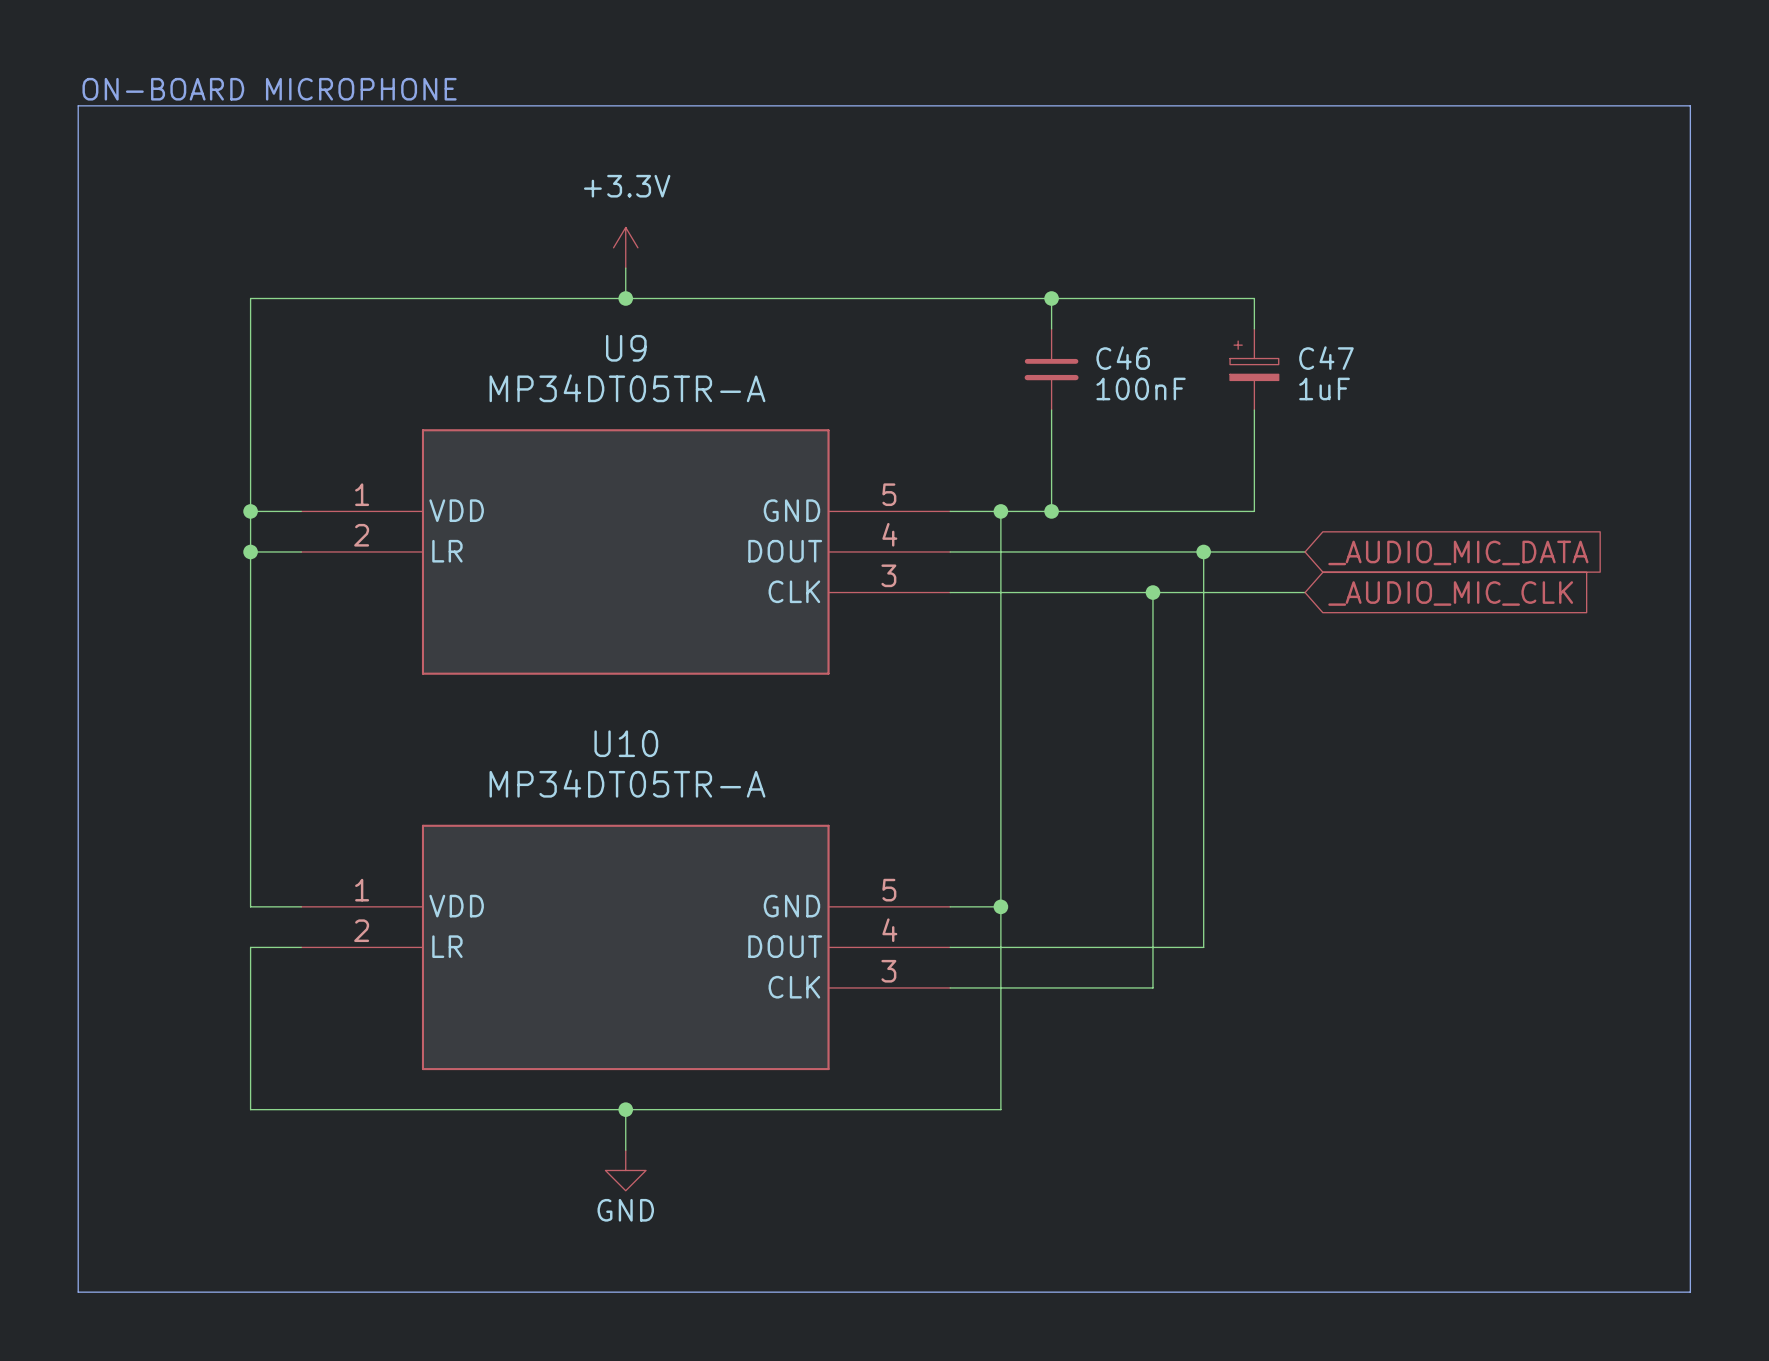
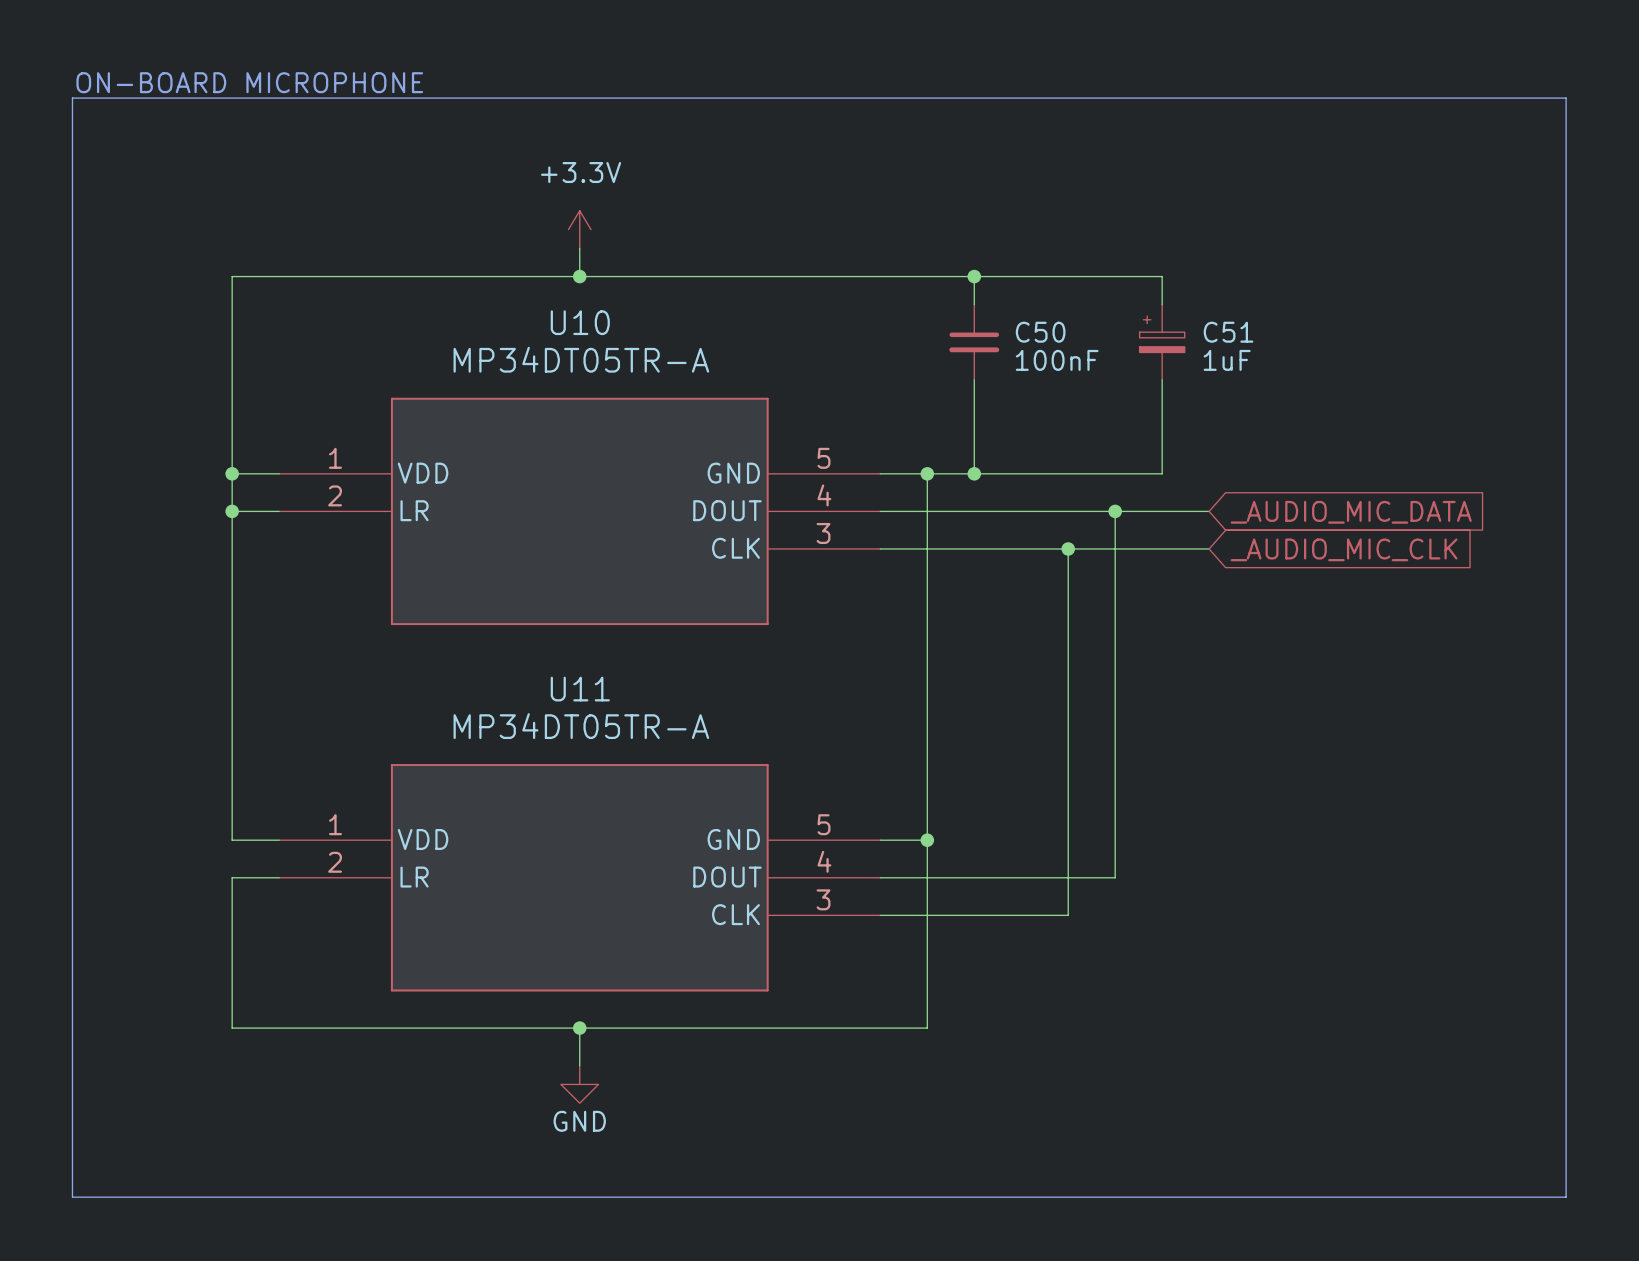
U9 name: U9 (626, 348) -> U10 (580, 322)
C46 name: C46 (1123, 358) -> C50 (1040, 332)
C47 name: C47 (1326, 358) -> C51 (1228, 332)
U10 name: U10 (626, 743) -> U11 (580, 689)

